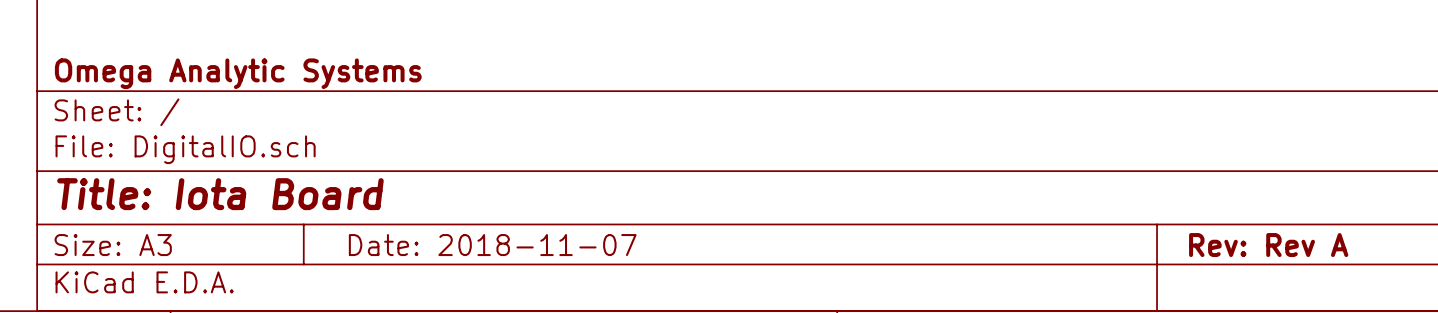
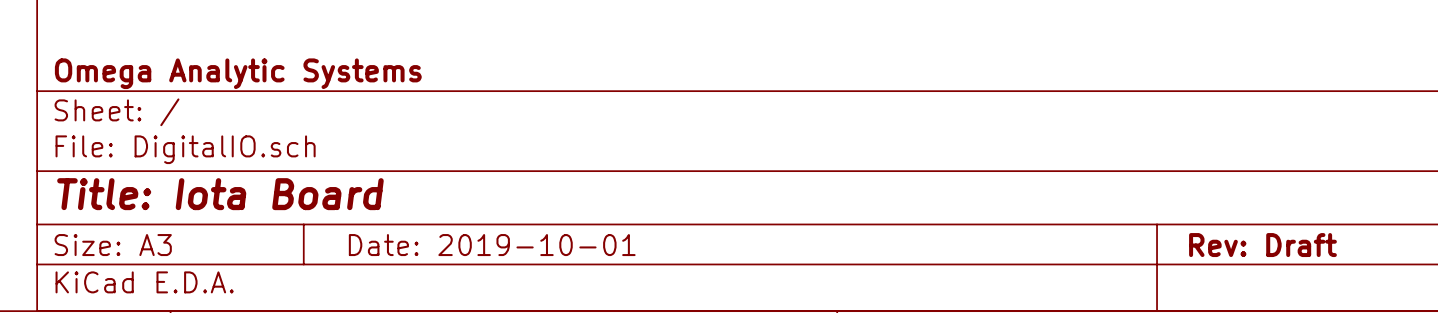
title block: Date: 2018-11-07 (492, 245) -> Date: 2019-10-01 (492, 245)
title block: Rev: Rev A (1268, 245) -> Rev: Draft (1262, 245)

